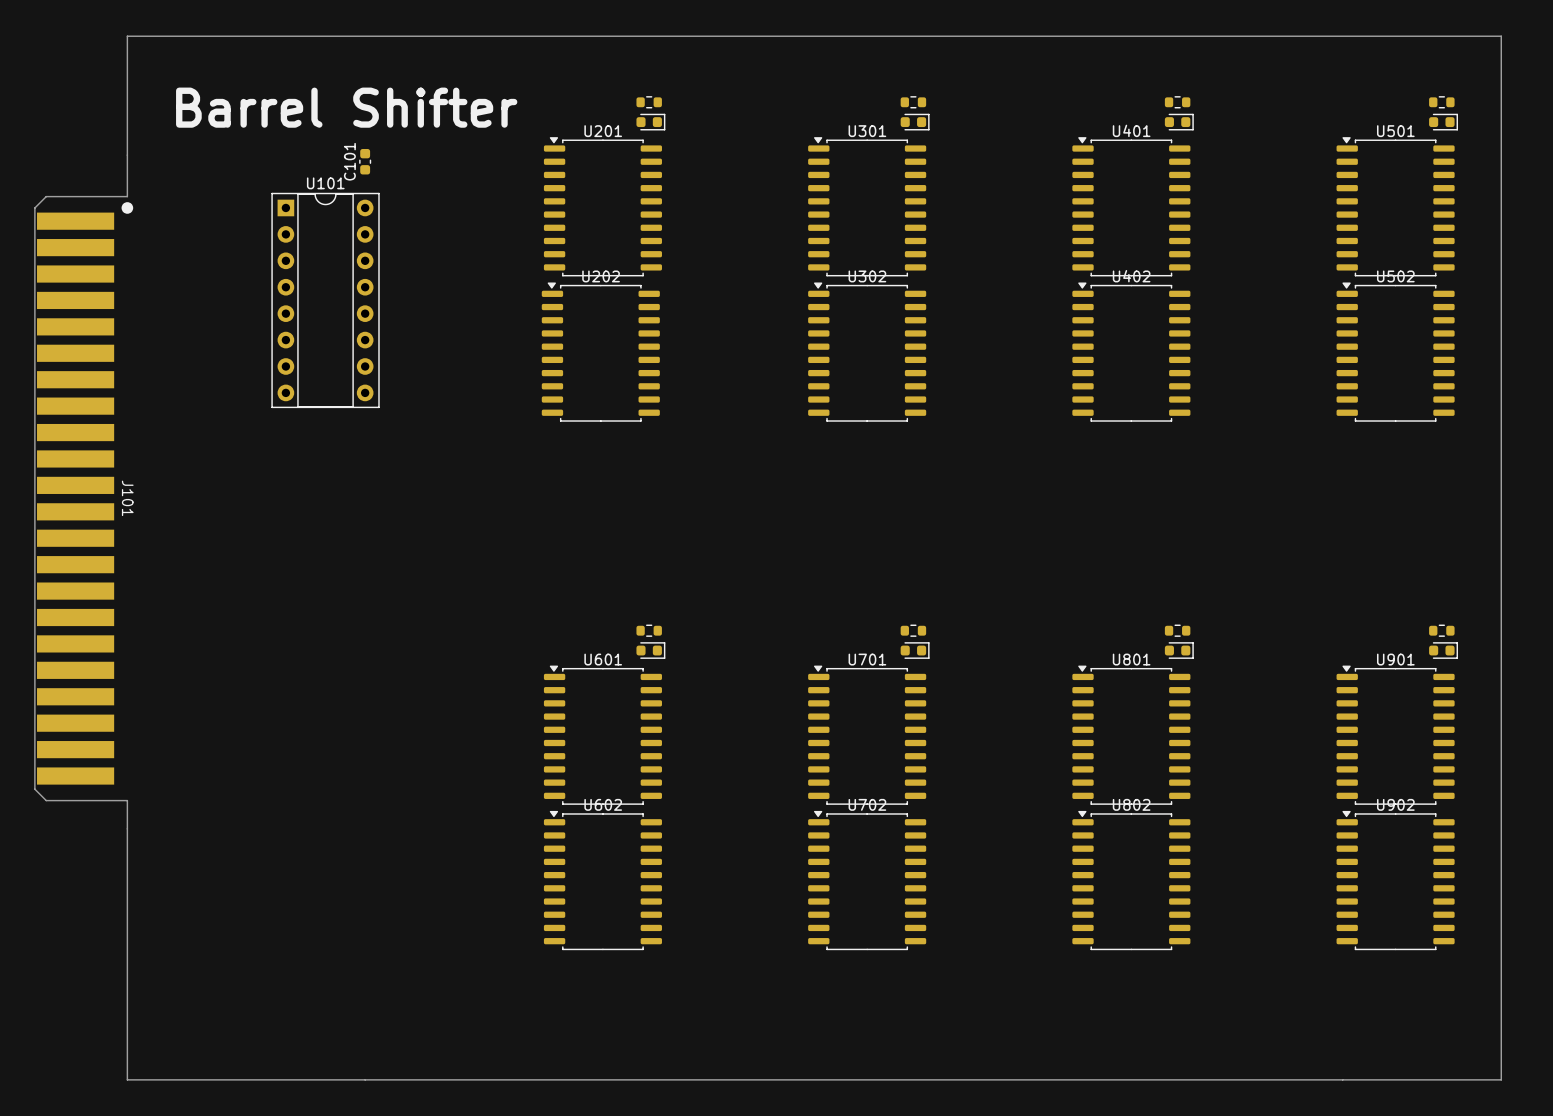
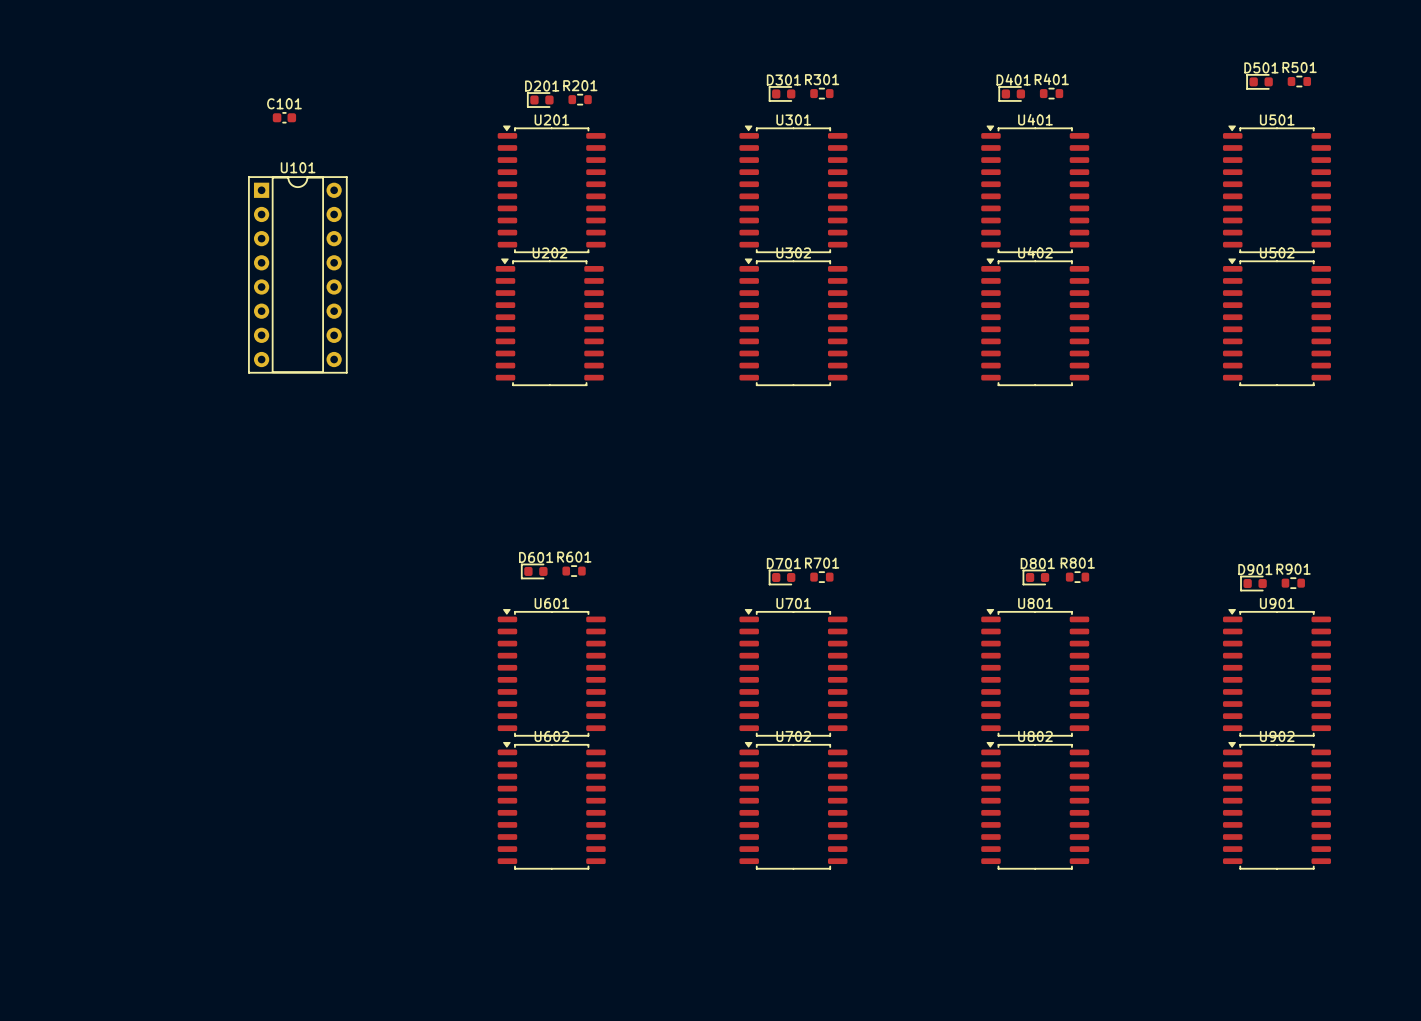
D501: none -> (1259, 81)
R501: none -> (1299, 81)
part: (649, 102) -> none
D301: none -> (782, 93)
R301: none -> (821, 93)
part: (913, 102) -> none
D401: none -> (1011, 93)
R401: none -> (1051, 93)
part: (1177, 102) -> none
part: (1441, 102) -> none
text: Barrel Shifter (346, 107) -> none
R201: none -> (580, 99)
D201: none -> (540, 100)
part: (650, 122) -> none
part: (915, 122) -> none
part: (1179, 122) -> none
part: (1443, 122) -> none
board edge: (127, 155) (127, 36) (1501, 36) (1501, 1079) (127, 1079) (127, 828) -> none
C101 rotation: 0° (365, 161) -> 90° clockwise (284, 117)
C101 position: (365, 161) -> (284, 117)
J101: (83, 492) -> none
R801 name: none -> R801 (1077, 563)
D601: none -> (534, 571)
R601: none -> (574, 571)
part: (649, 630) -> none
R701: none -> (821, 577)
part: (913, 630) -> none
part: (1441, 630) -> none
D701: none -> (782, 577)
D801: none -> (1036, 577)
D901: none -> (1253, 583)
R901: none -> (1293, 583)
part: (650, 650) -> none
part: (915, 650) -> none
part: (1179, 650) -> none
part: (1443, 650) -> none

